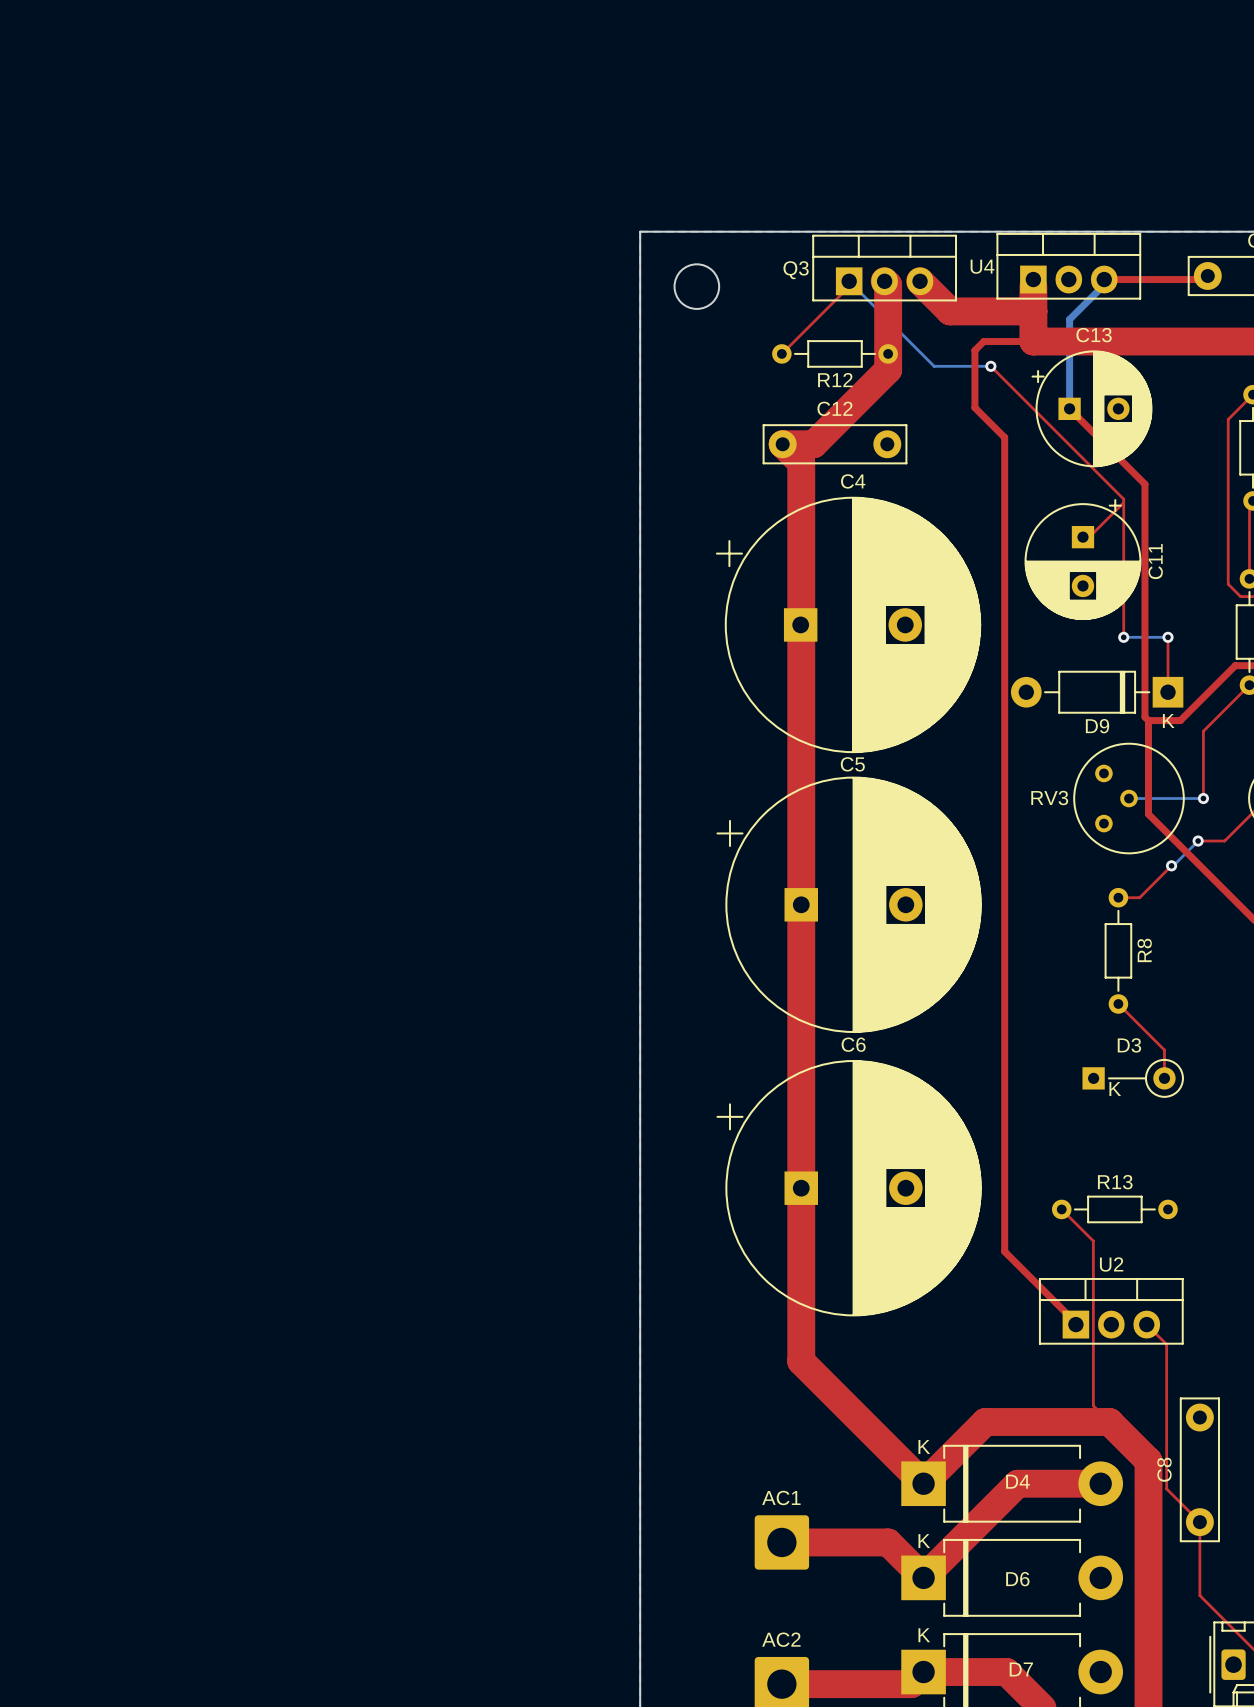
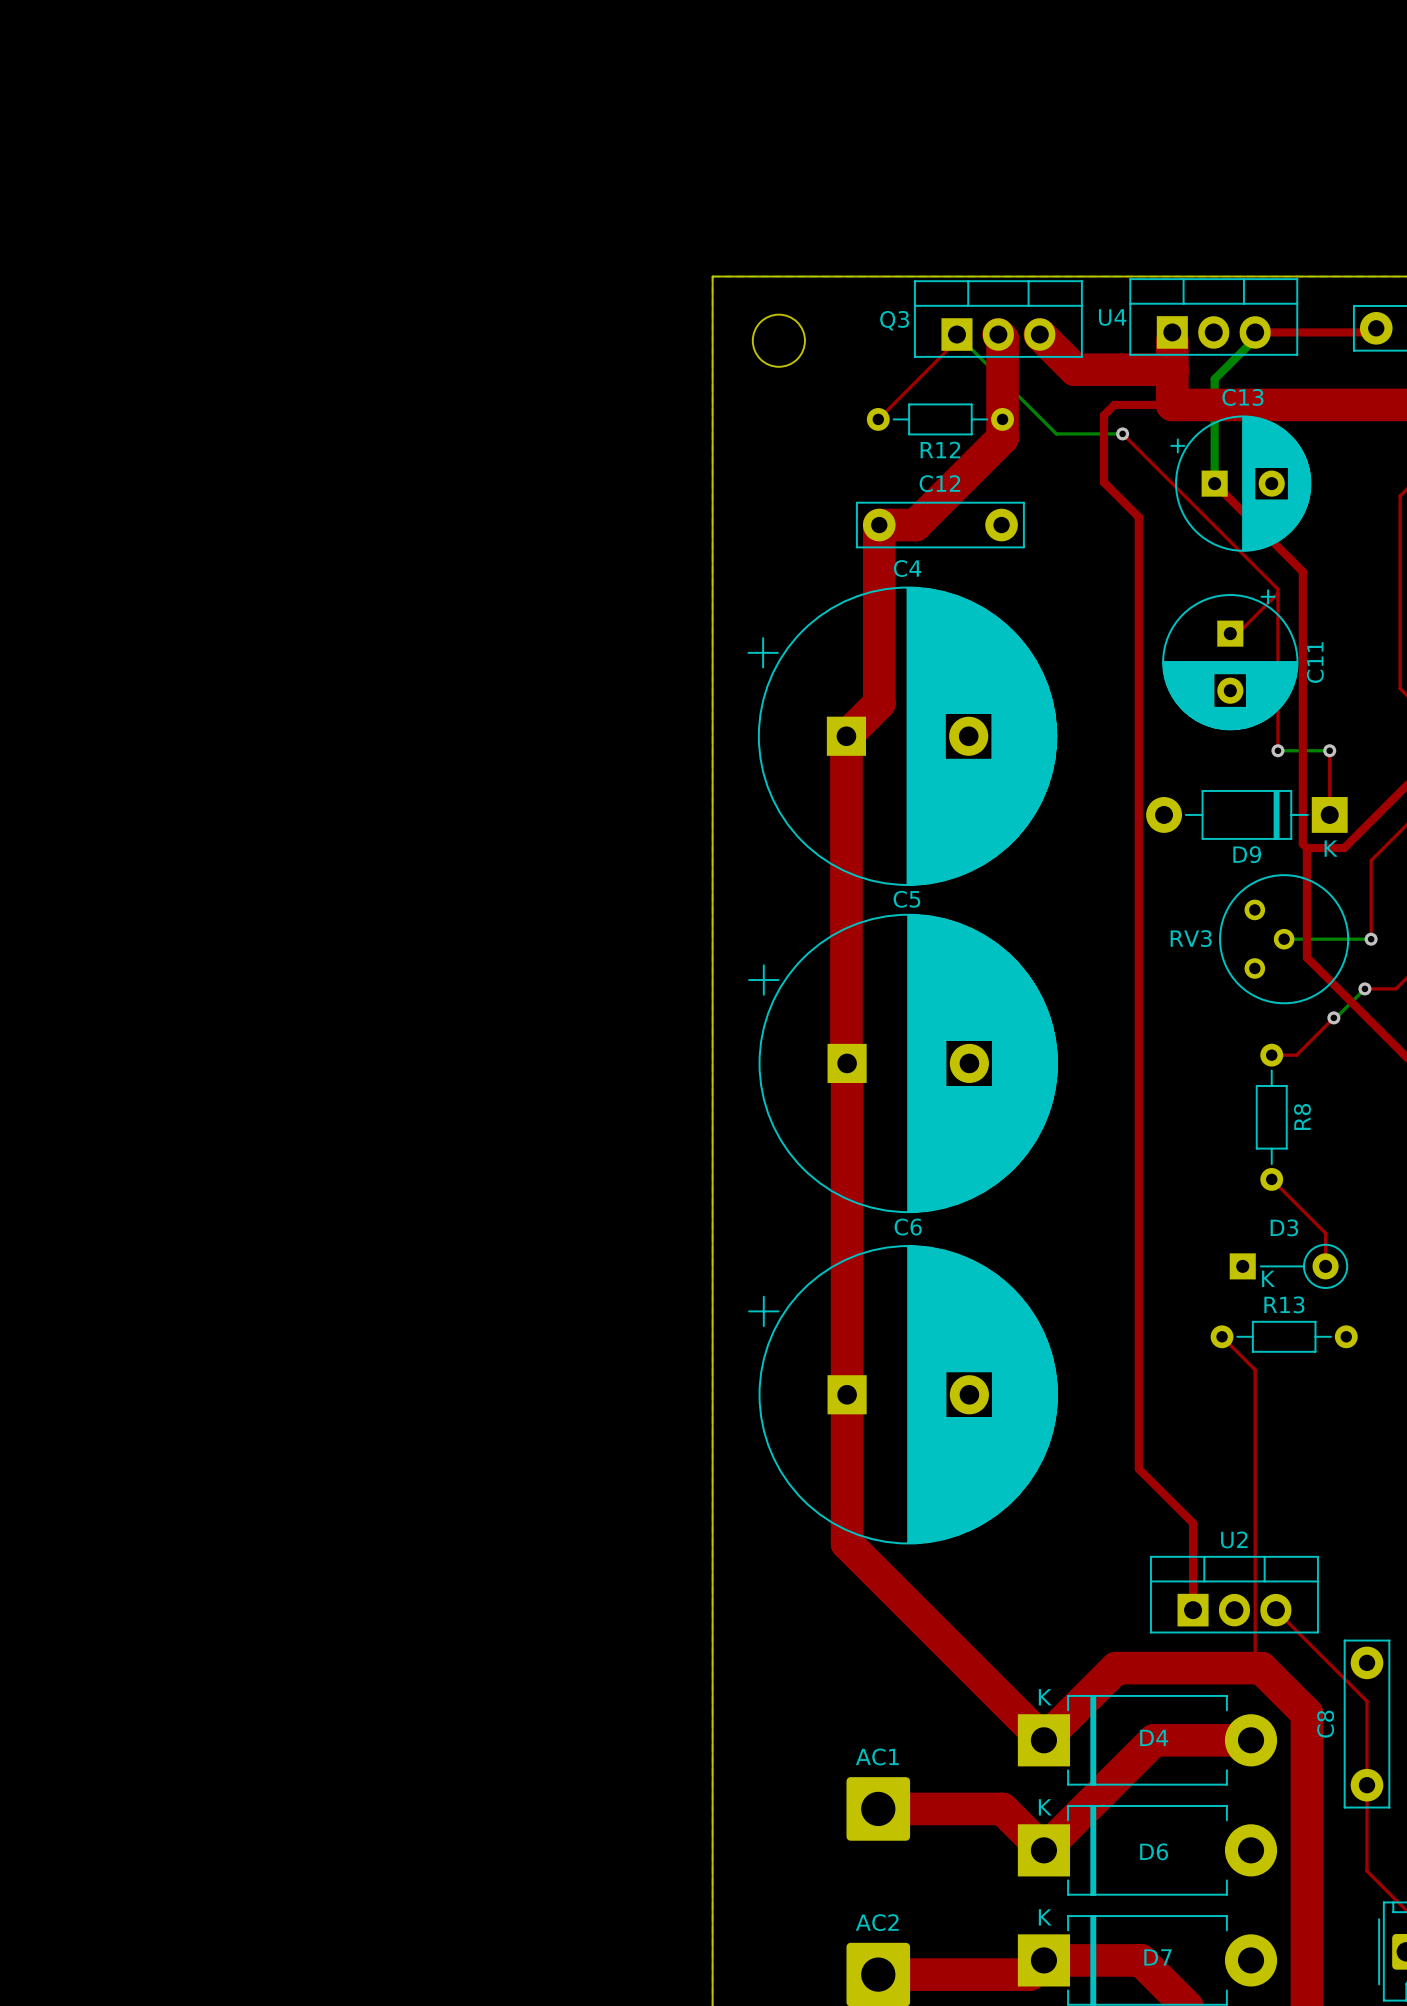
top track: (782, 444) (801, 462) (801, 1361) -> (879, 525) (879, 703) (846, 736) (847, 1543) (900, 1597)
C4 position: (848, 624) -> (902, 736)
C5 position: (849, 904) -> (903, 1063)
C6 position: (849, 1188) -> (903, 1394)
top track: (1061, 1209) (1093, 1241) (1093, 1405) (1104, 1416) -> (1222, 1336) (1255, 1369) (1255, 1661)
R13 position: (1114, 1209) -> (1284, 1336)
top track: (1051, 1298) (1075, 1324) -> (1193, 1523) (1193, 1610)
U2 position: (1111, 1311) -> (1234, 1594)
top track: (1146, 1324) (1166, 1344) (1166, 1488) (1199, 1522) -> (1275, 1610) (1366, 1701) (1366, 1785)

